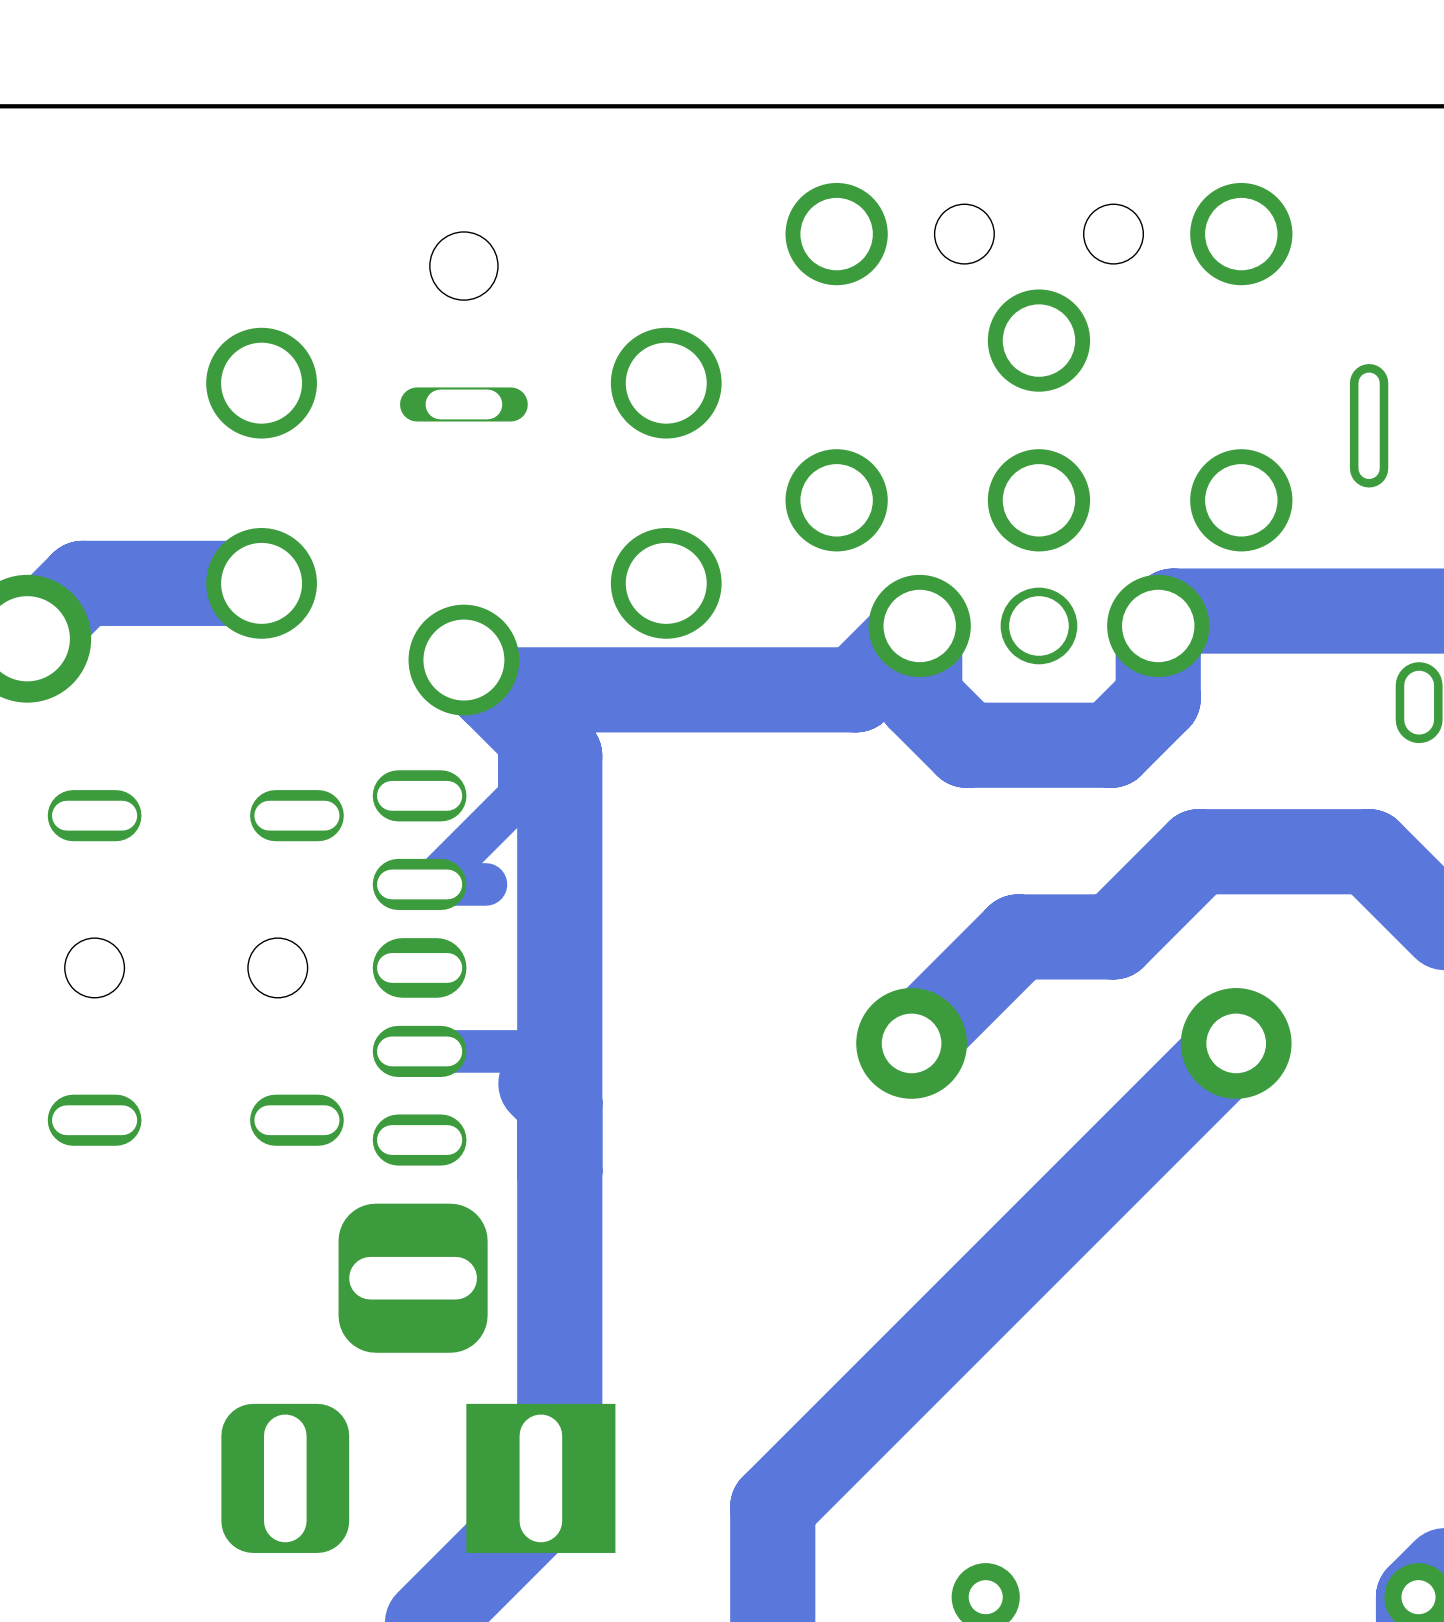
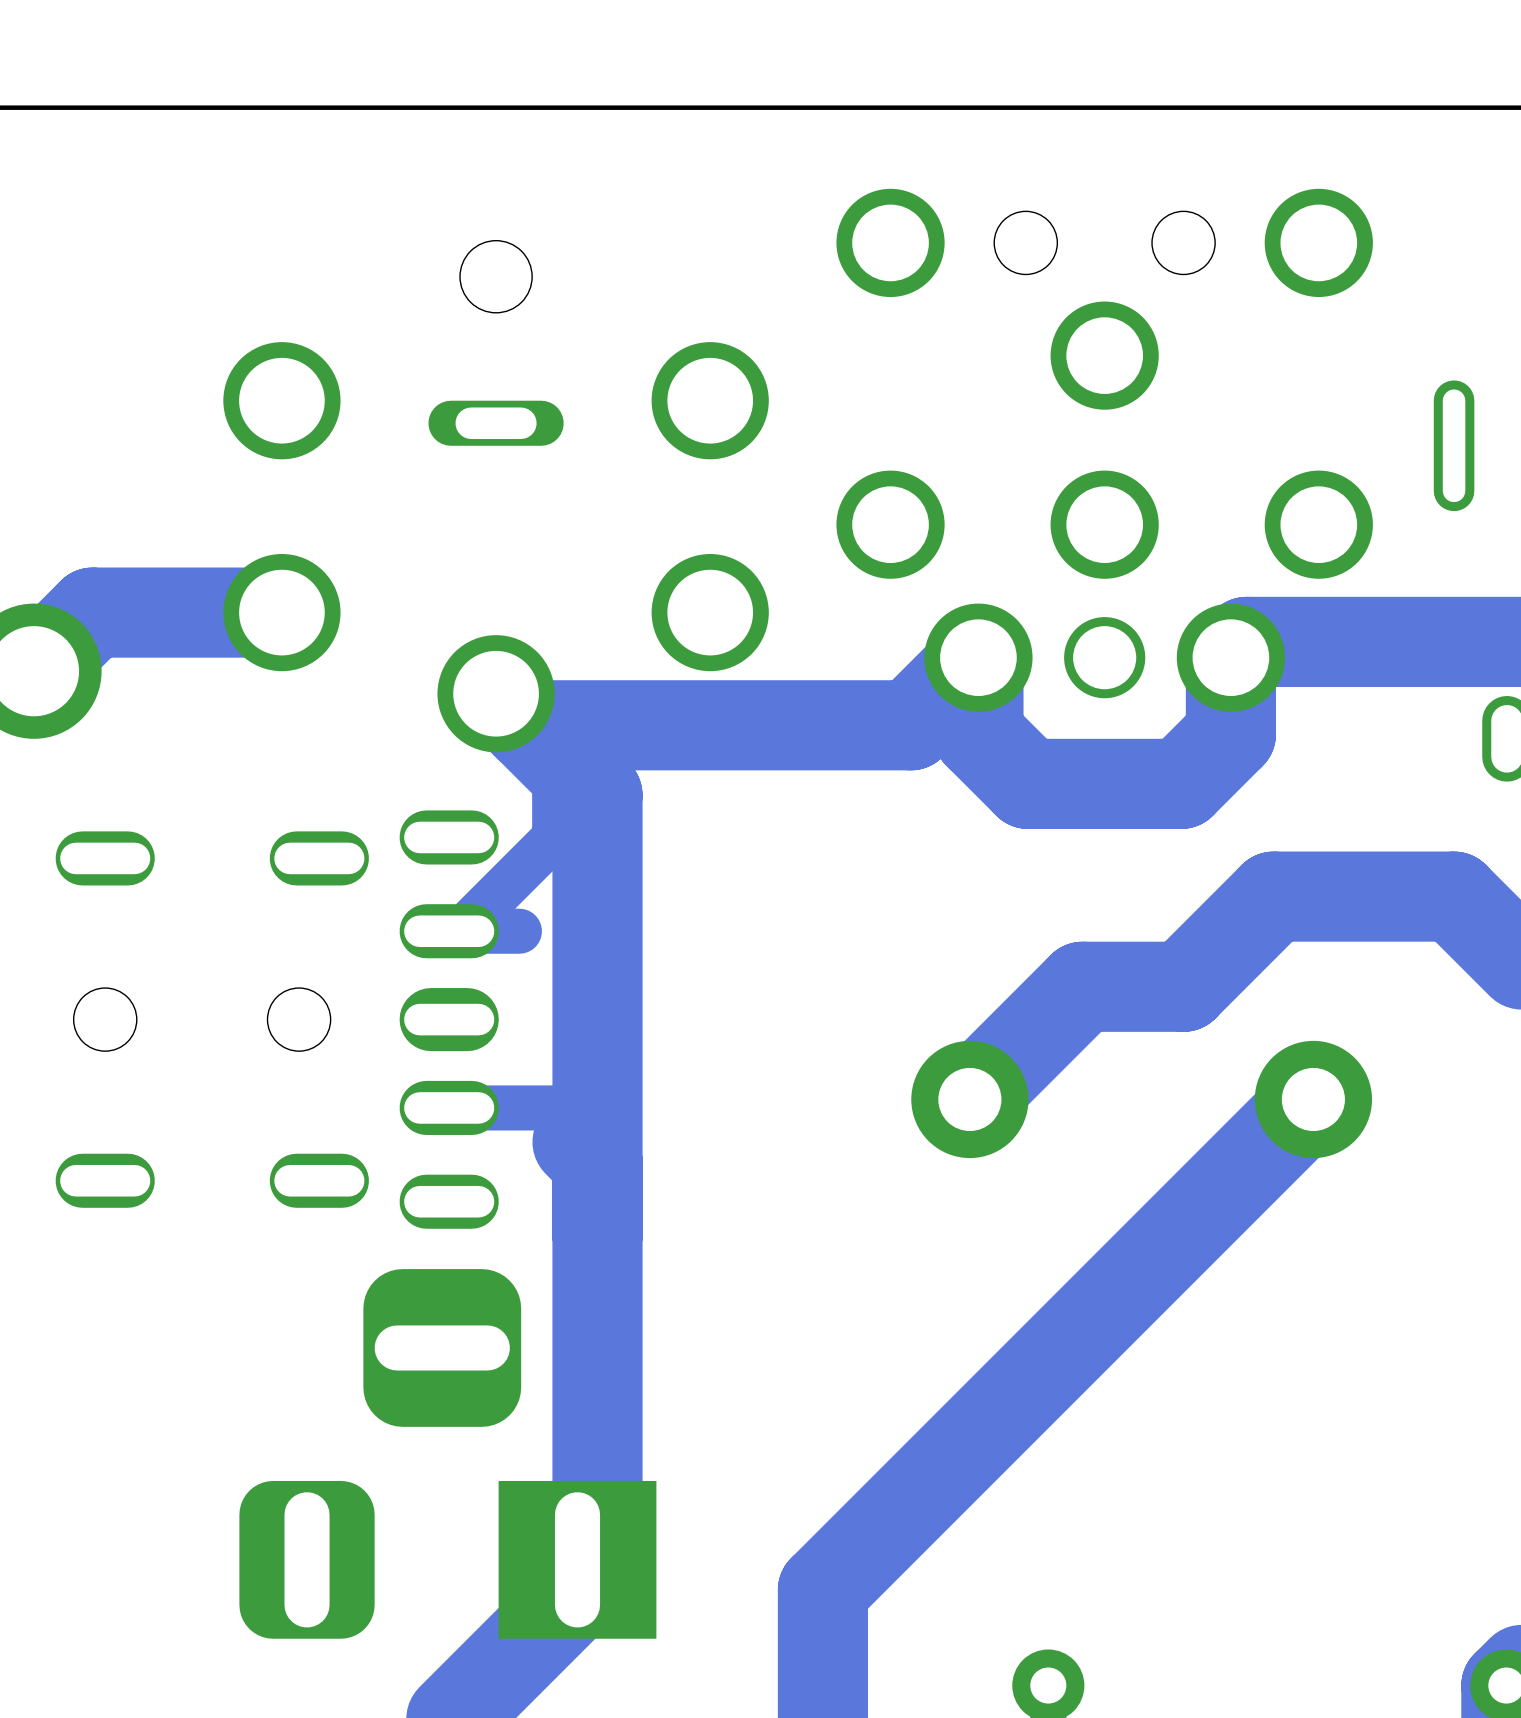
part footprint: [206, 231, 722, 716] -> [223, 240, 769, 753]

